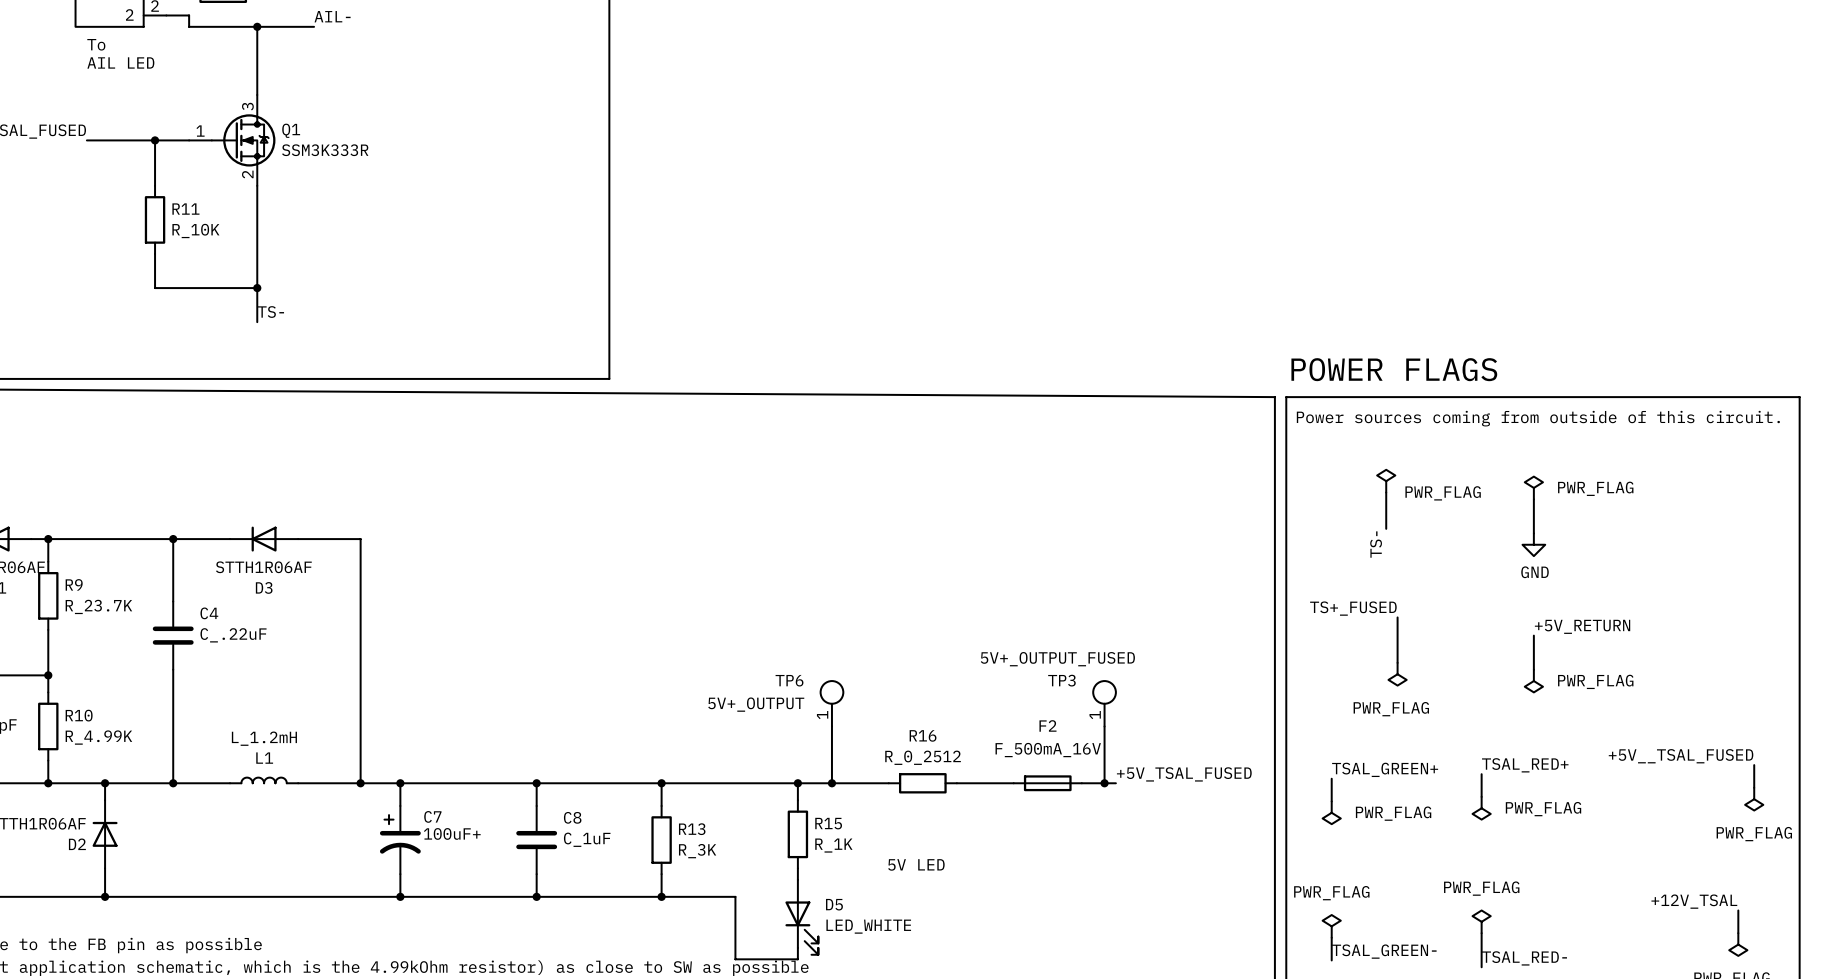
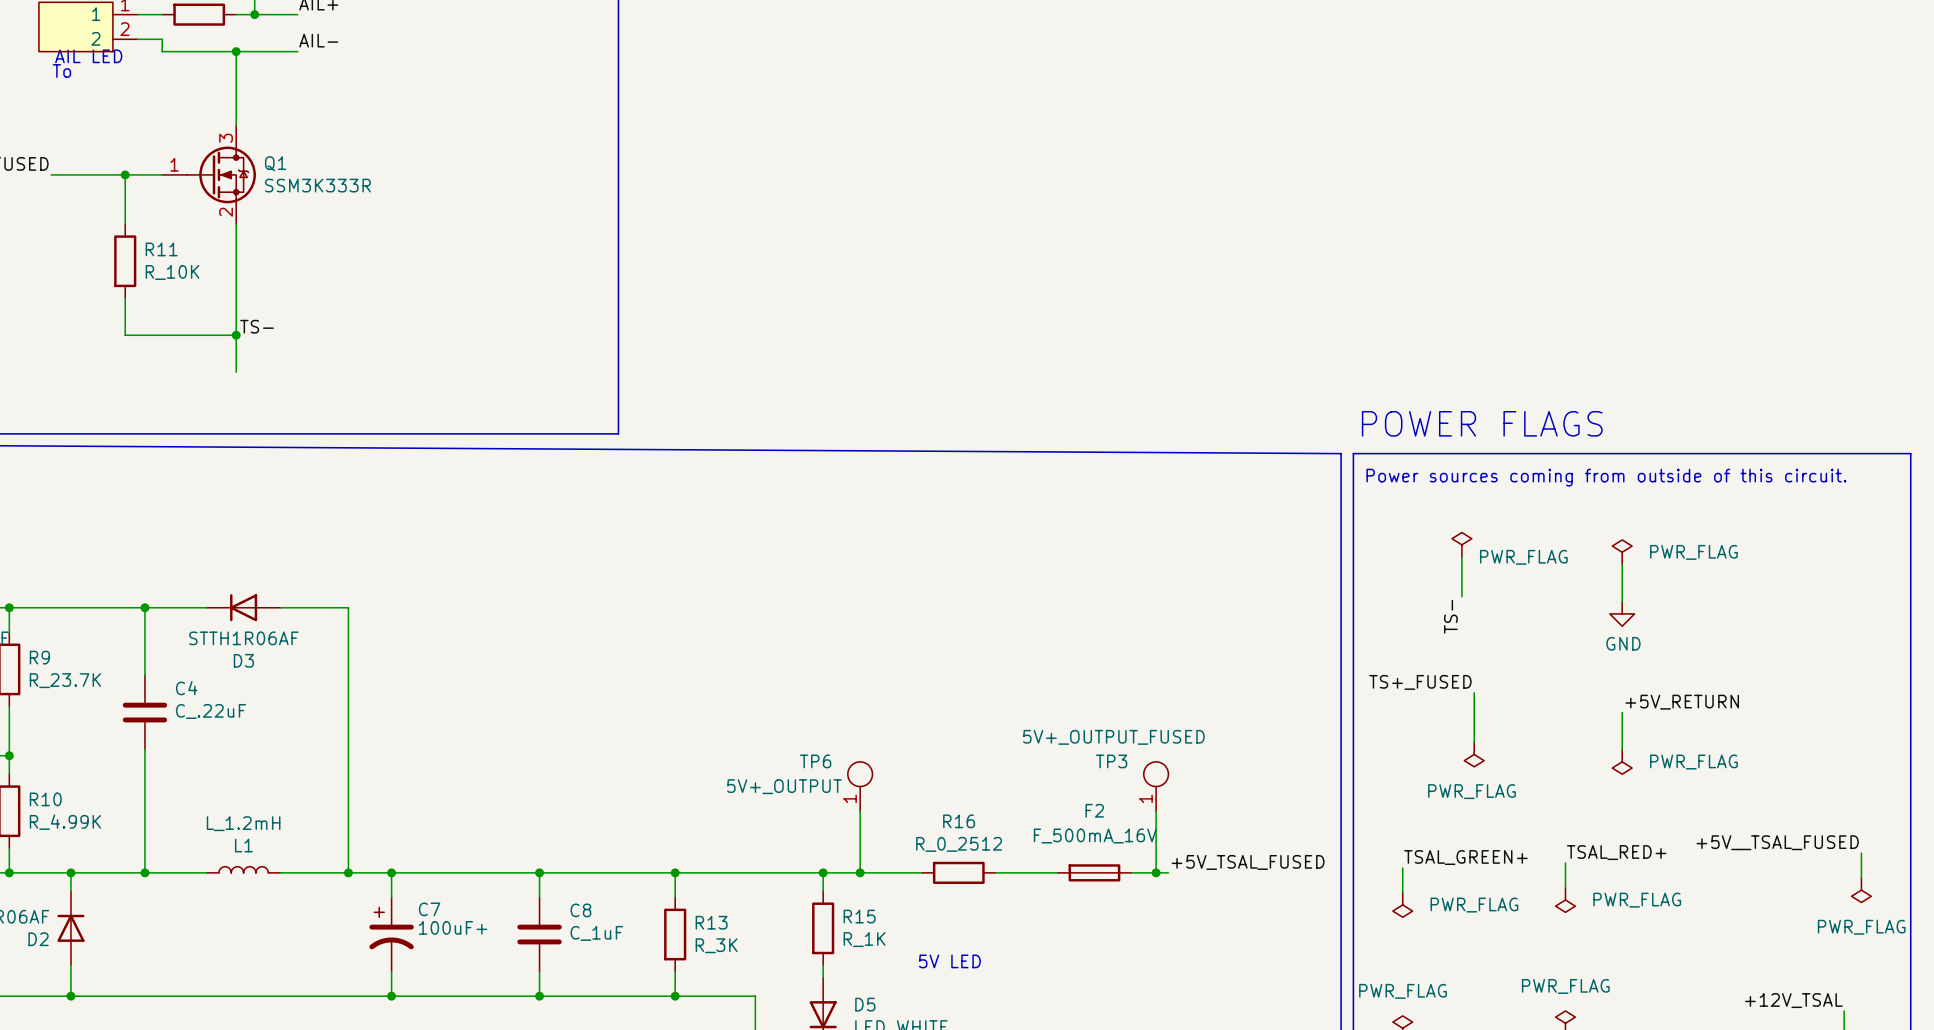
text position: AIL LED (120, 62) -> AIL LED (88, 56)
label position: TS- (270, 312) -> TS- (256, 326)

